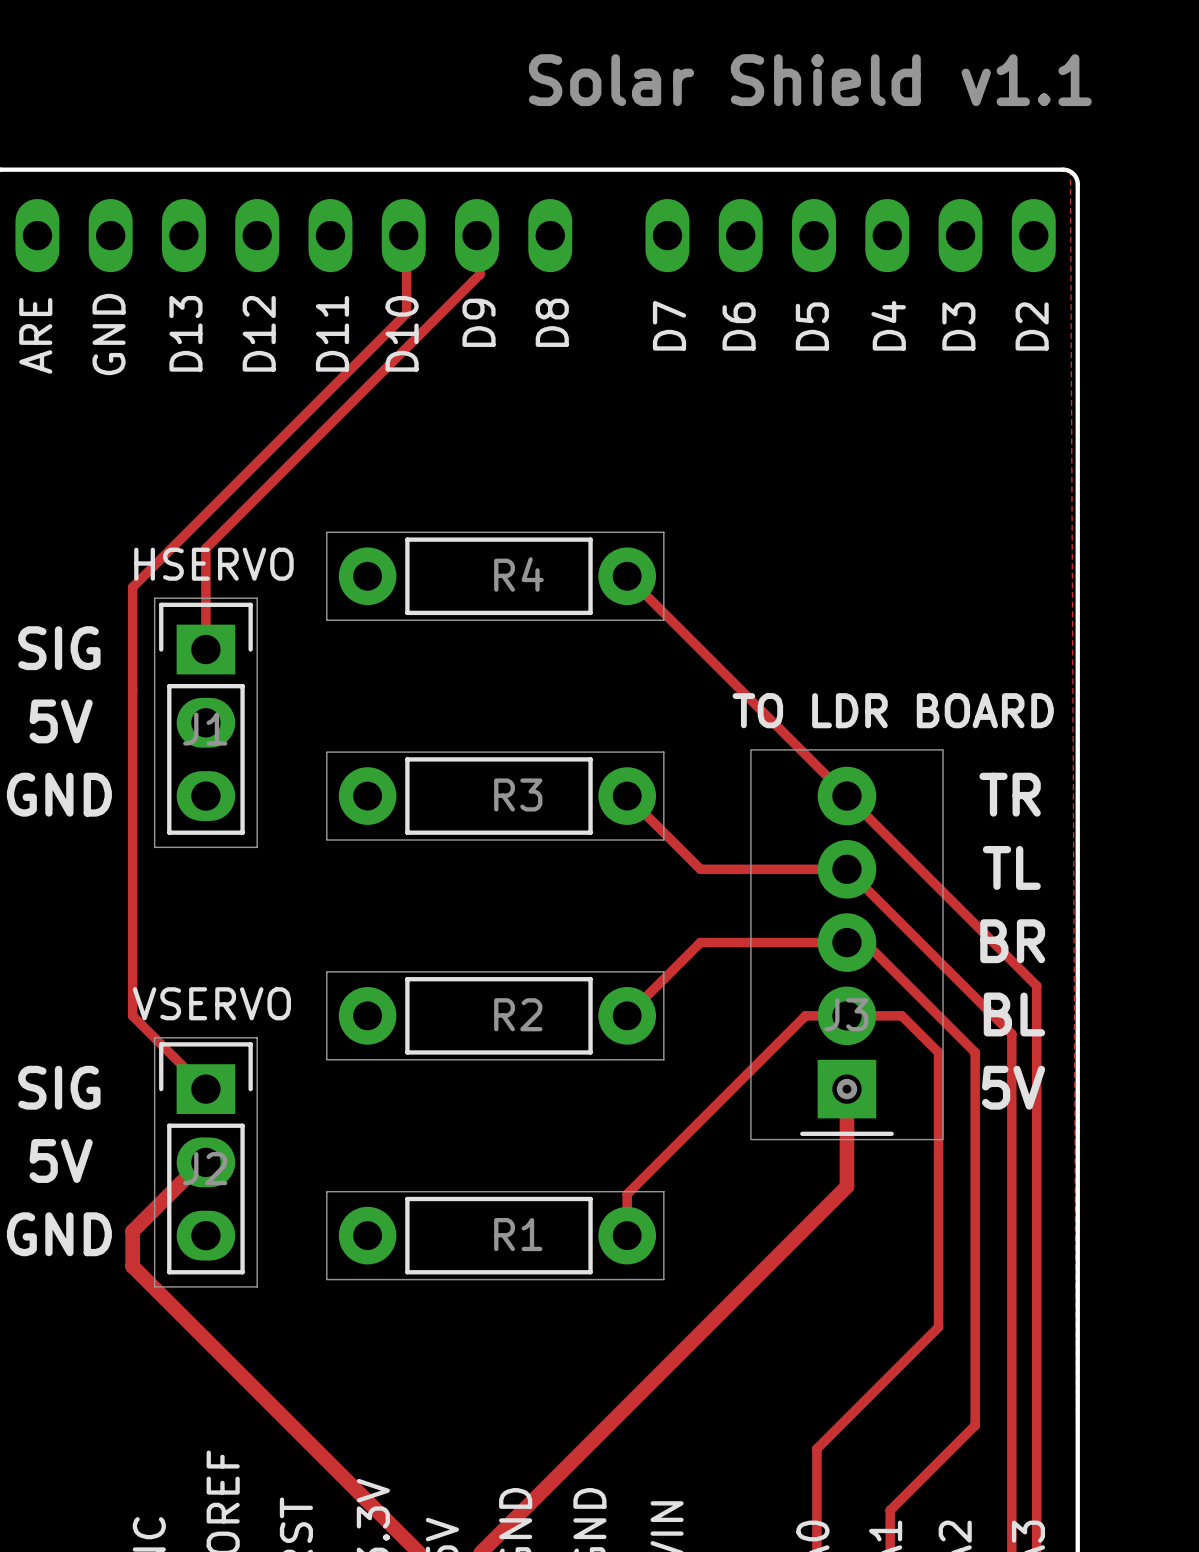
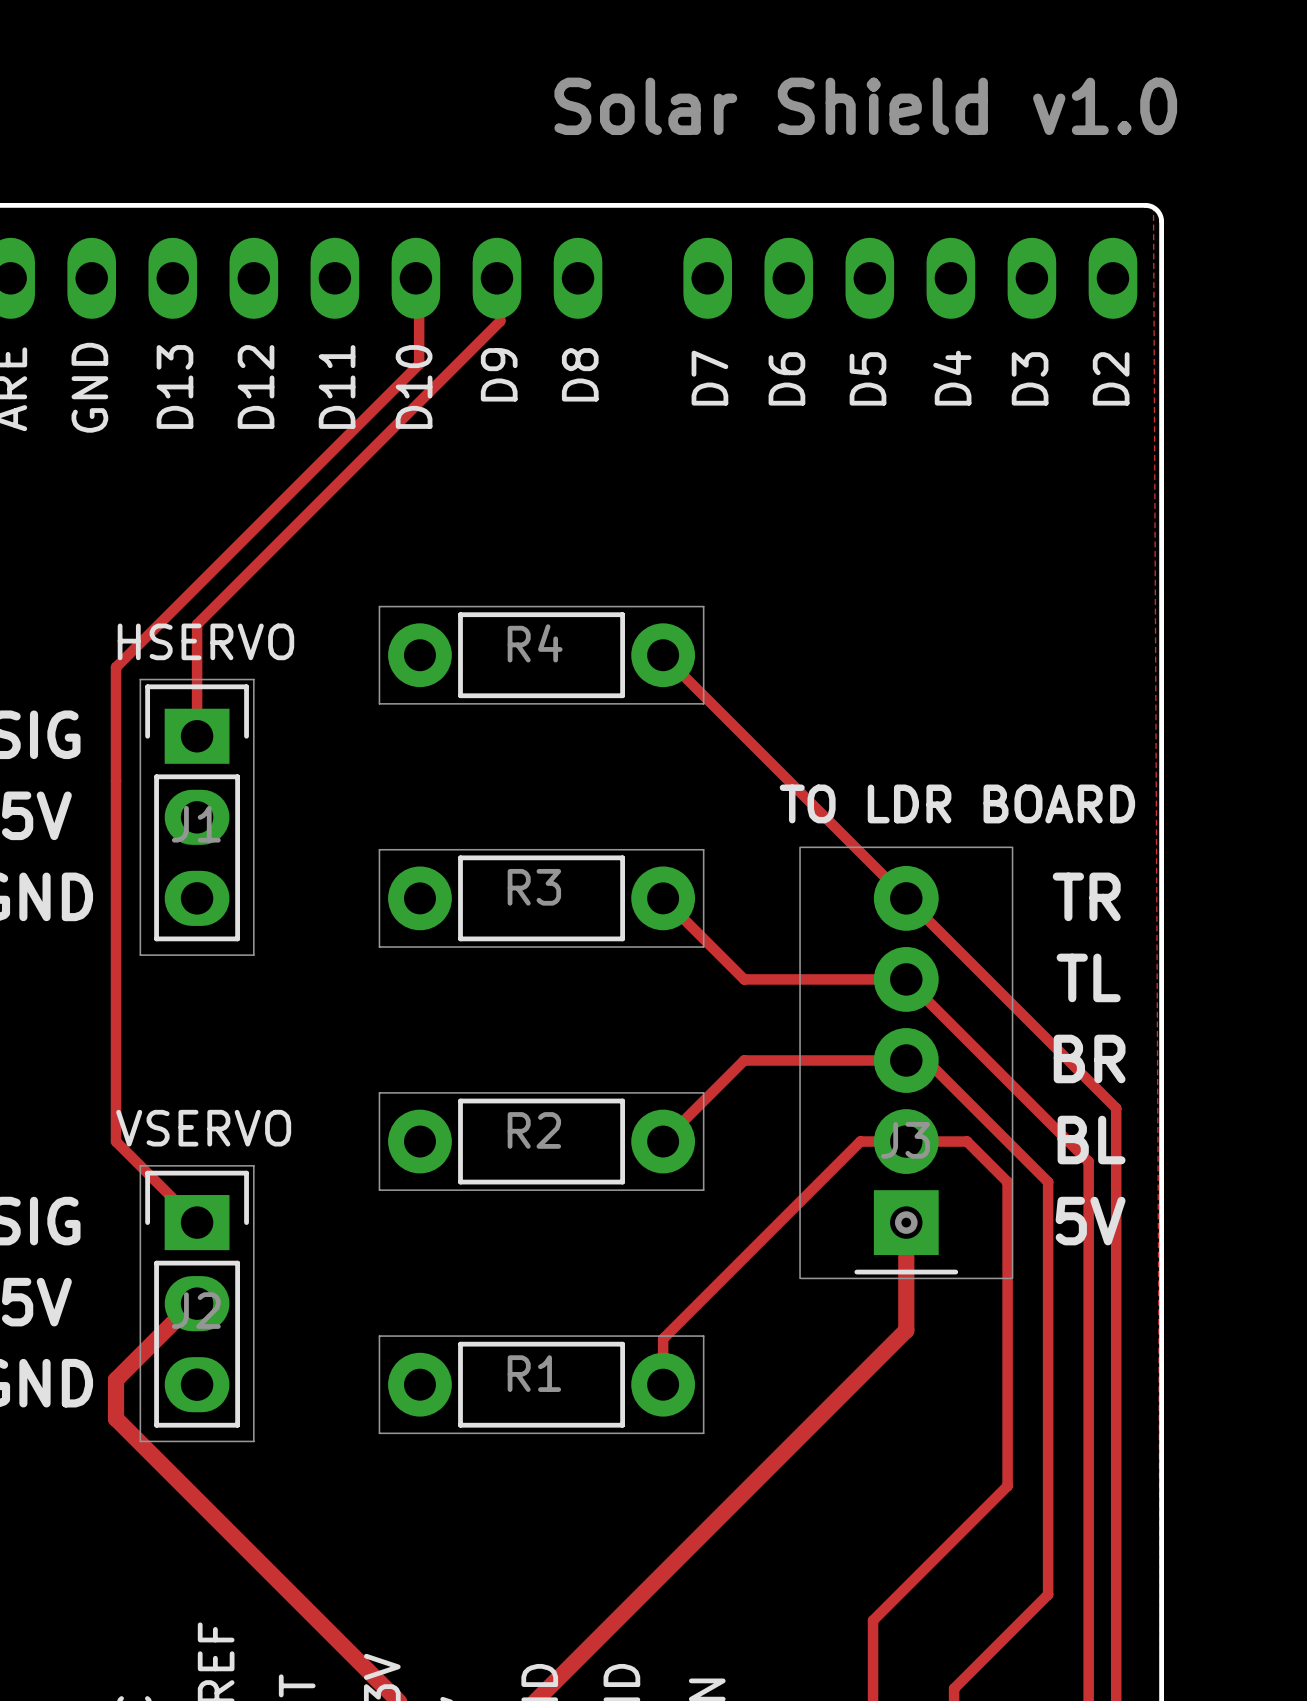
text: Solar Shield v1.1 (810, 80) -> Solar Shield v1.0 (865, 106)
R4 footprint: [326, 531, 665, 621] -> [378, 605, 705, 705]
R3 footprint: [326, 751, 665, 841] -> [378, 848, 705, 948]
R2 footprint: [326, 971, 665, 1061] -> [378, 1092, 705, 1191]
R1 footprint: [326, 1190, 665, 1281] -> [378, 1335, 705, 1435]

